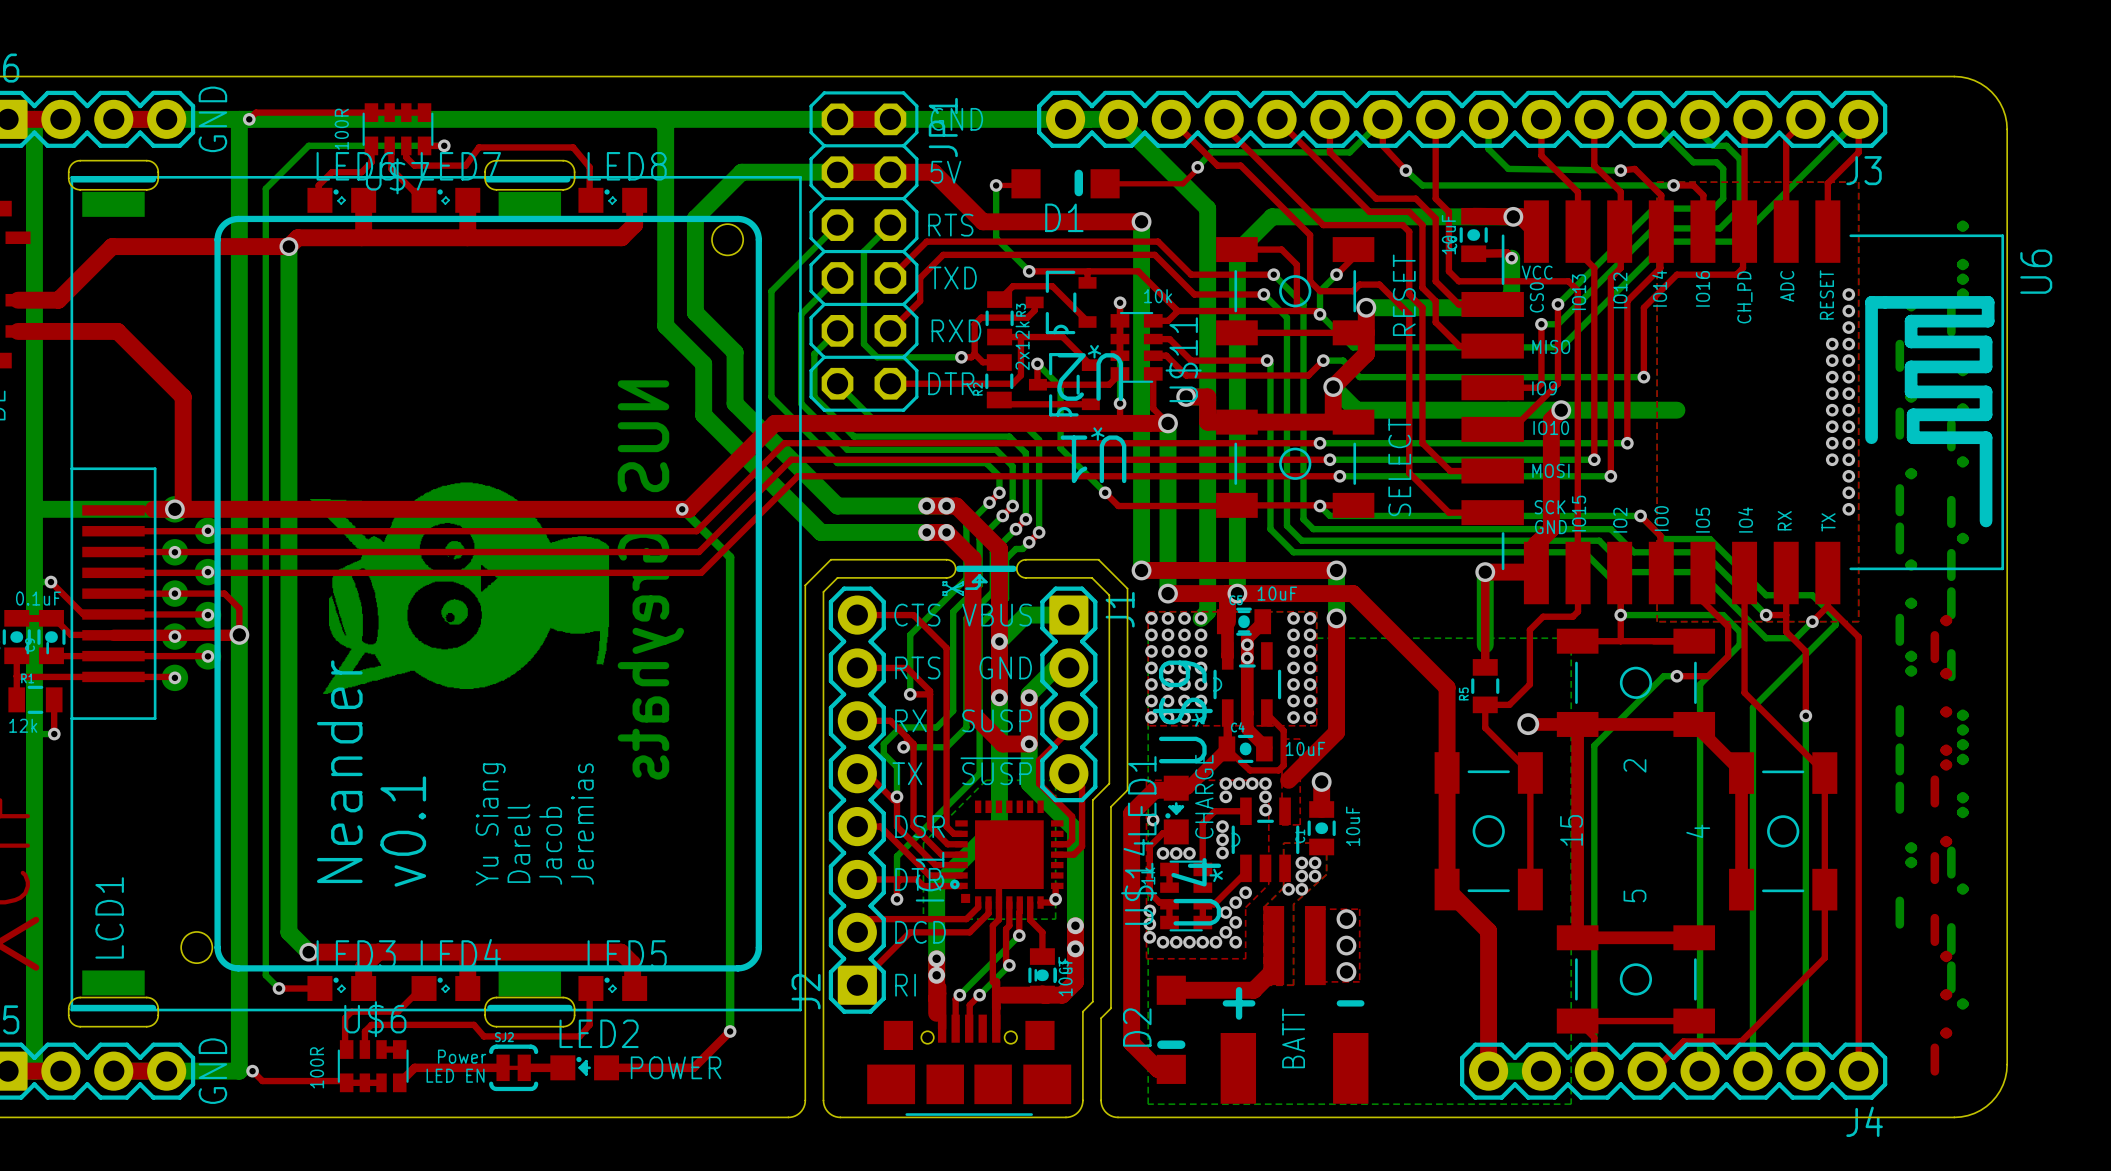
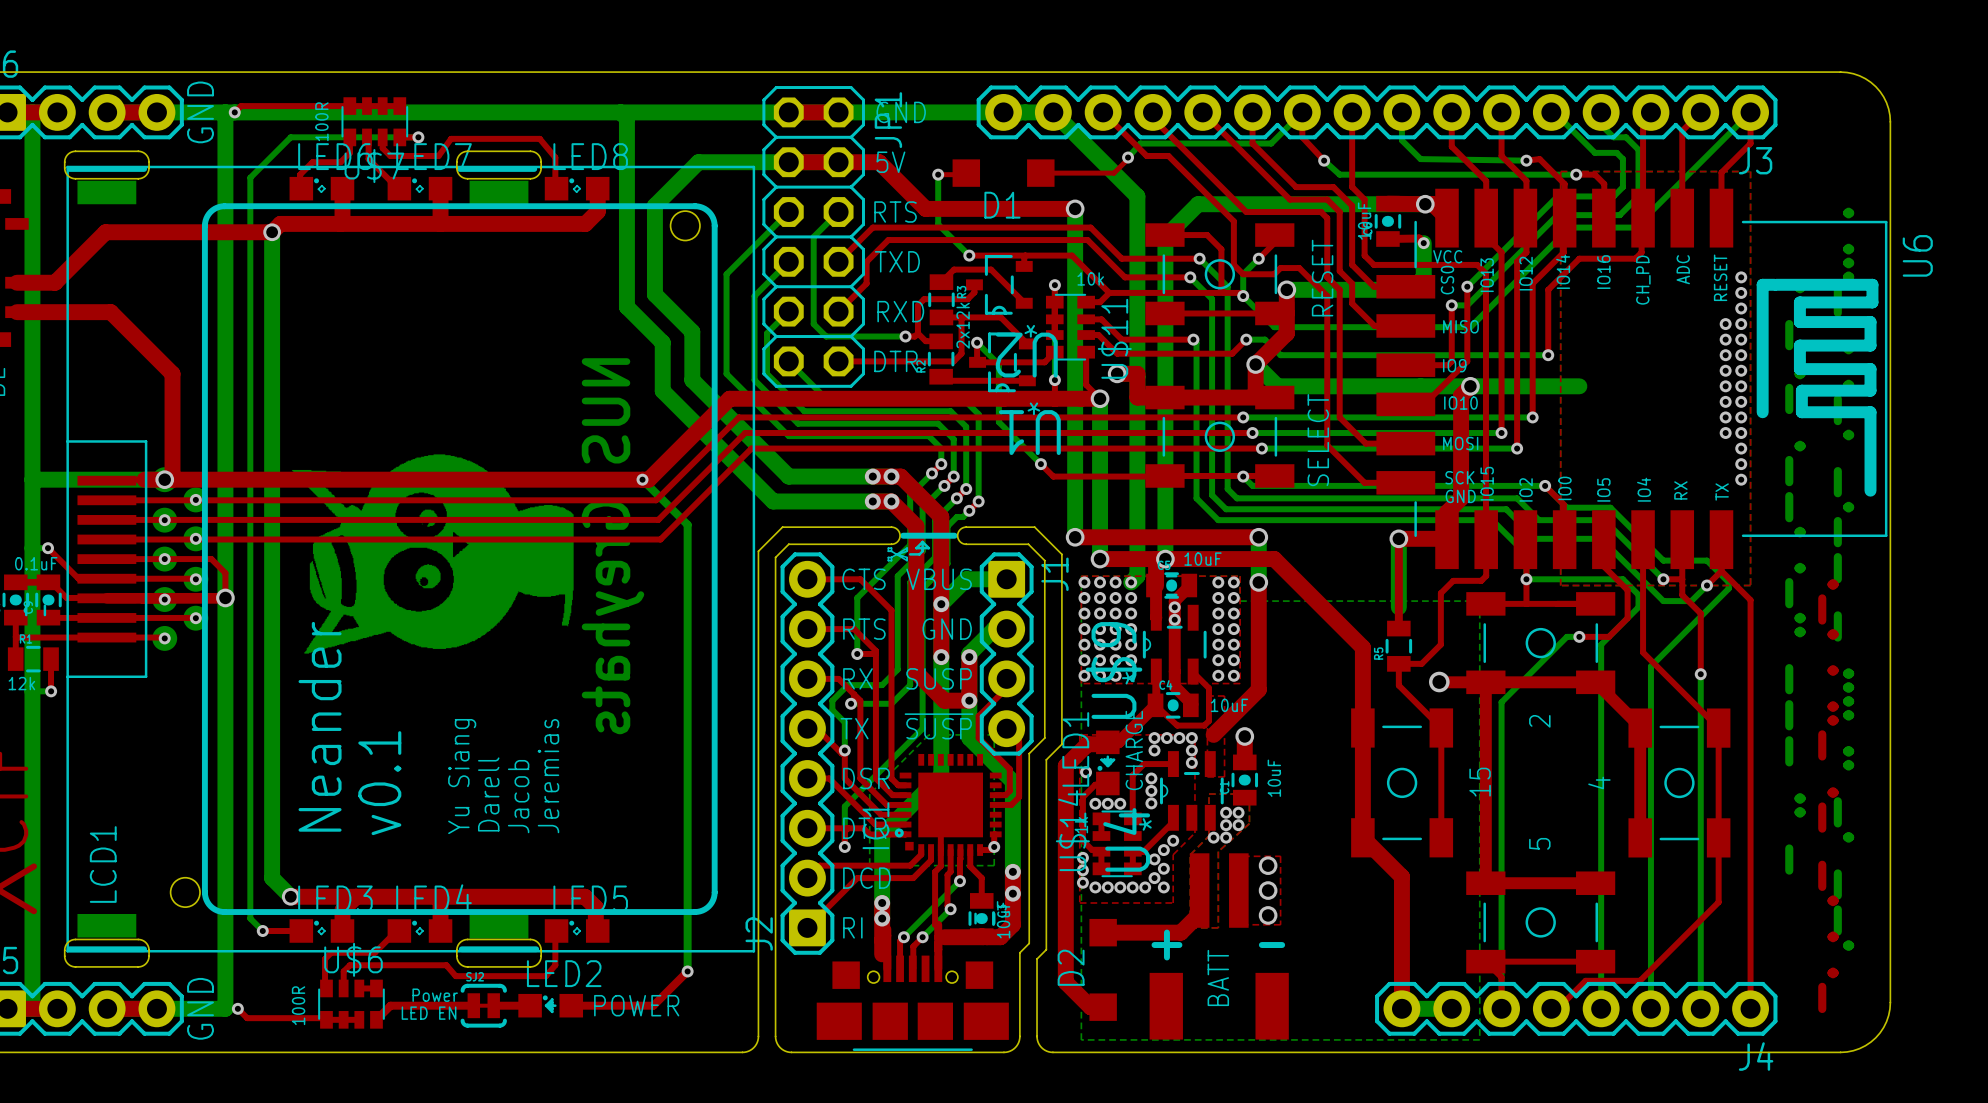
line: (1078, 173) (1078, 192) -> none
line: (1161, 1044) (1181, 1044) -> none

